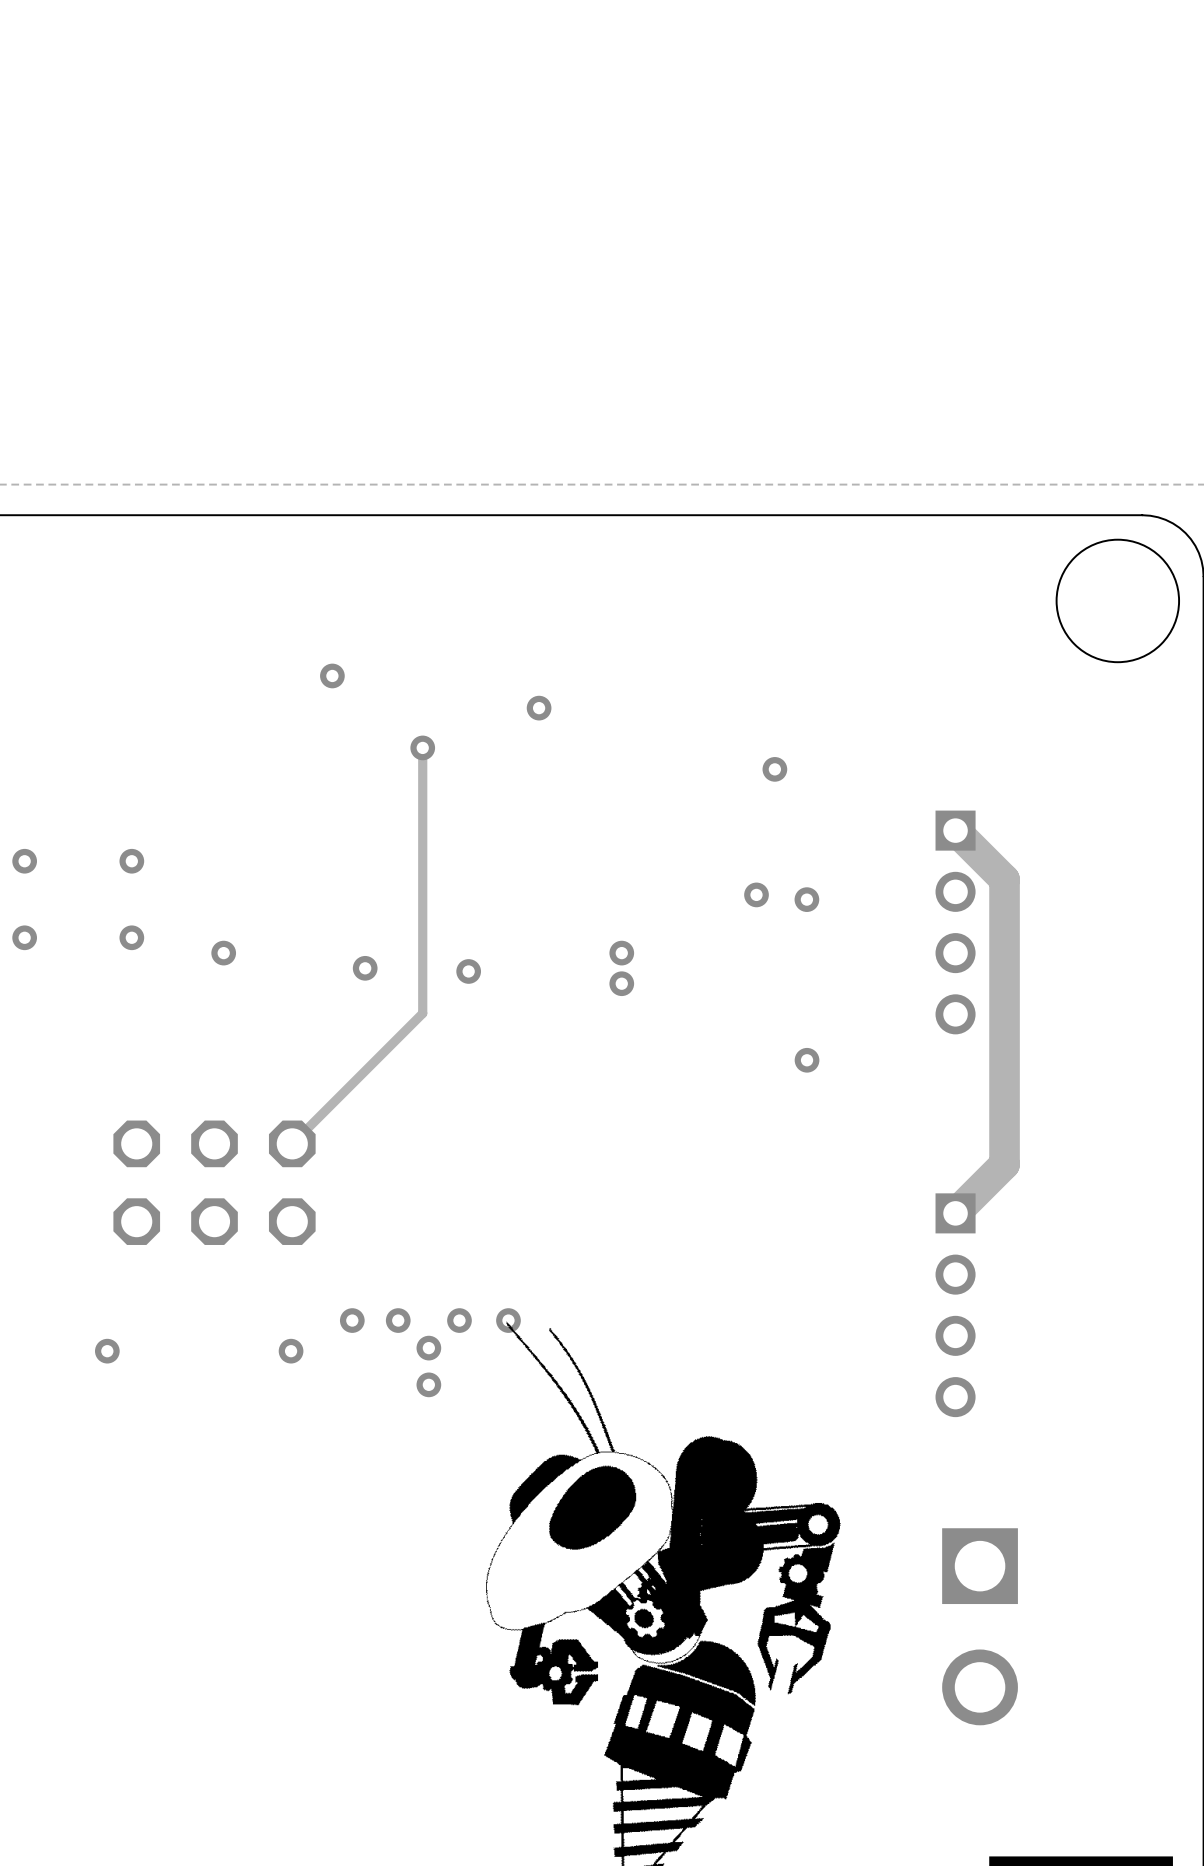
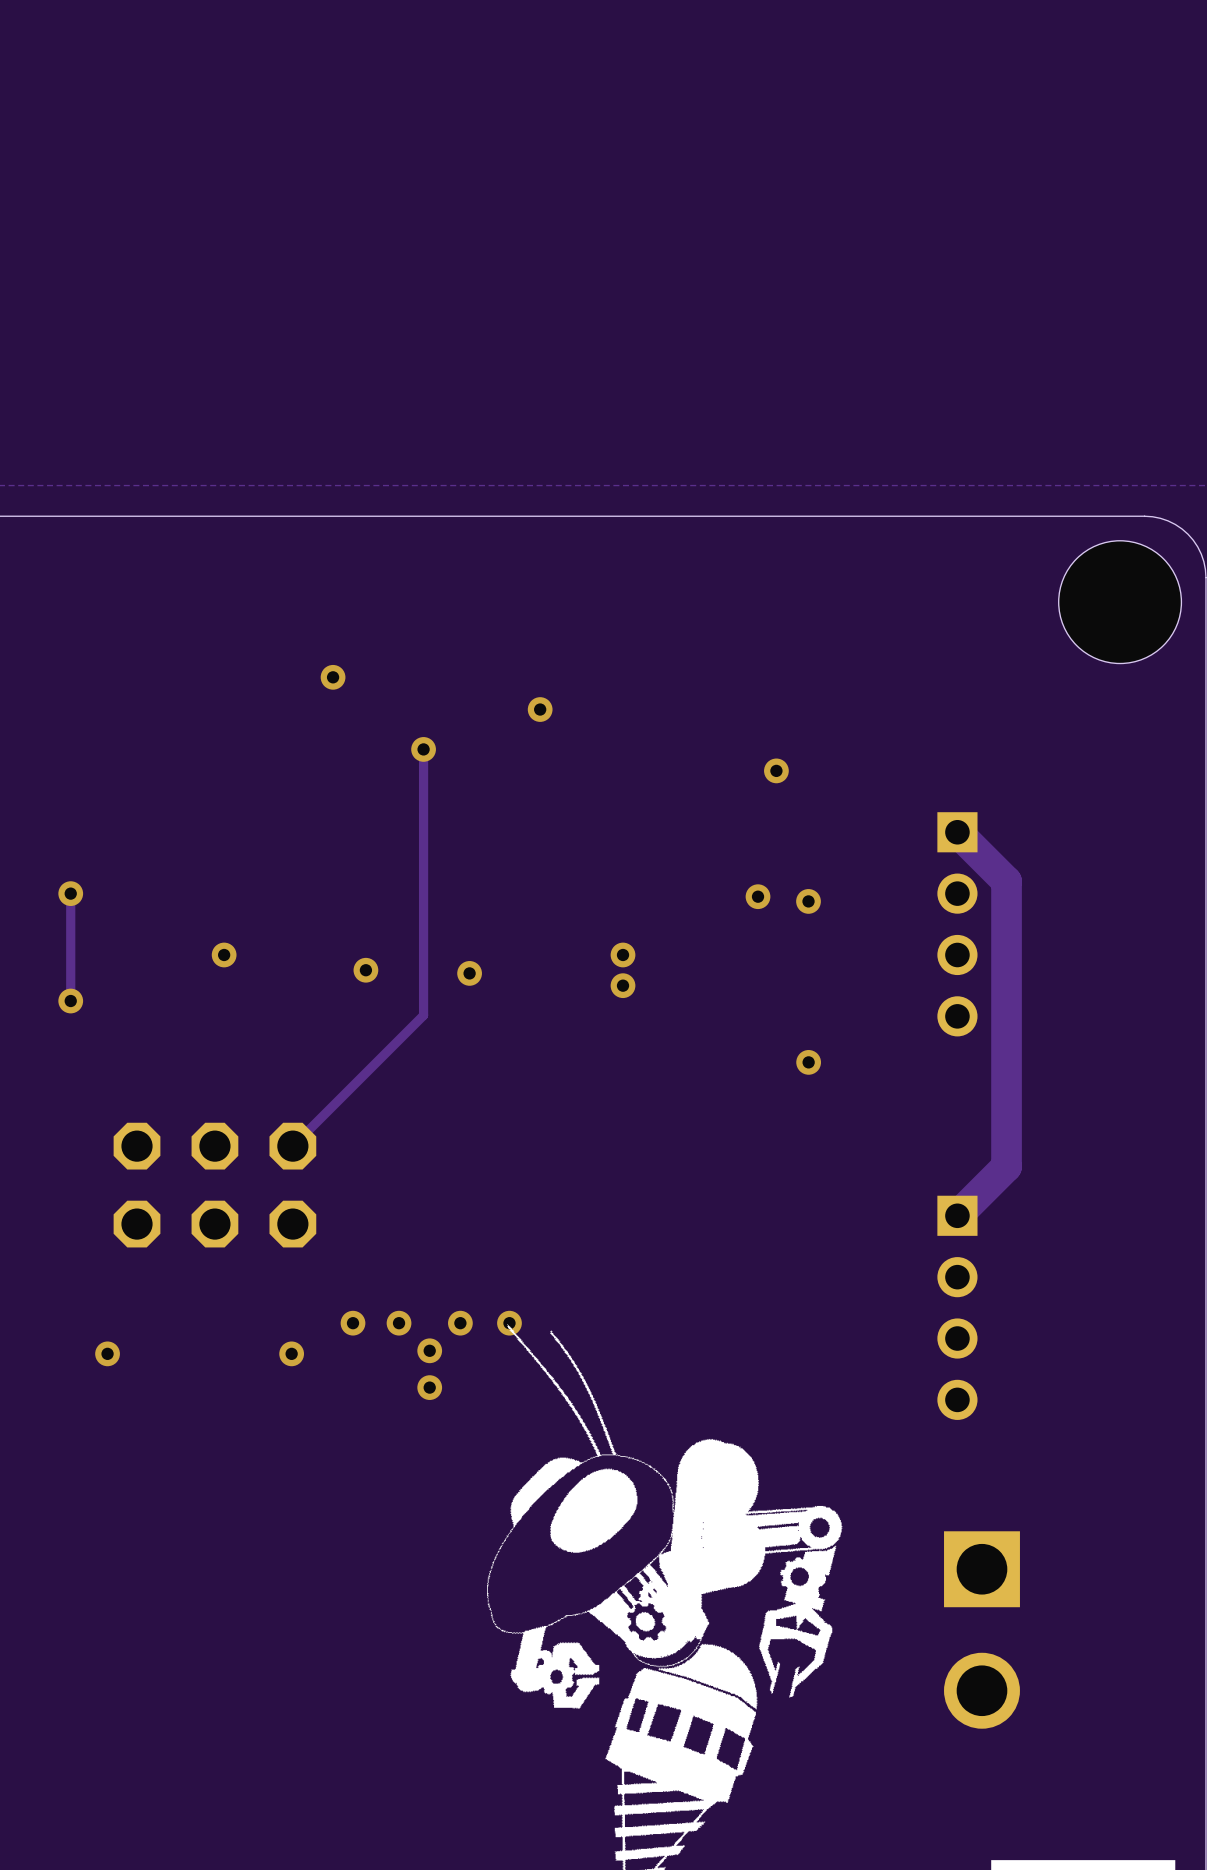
via: (24, 861) -> none
via: (131, 861) -> none
track: none -> (70, 893) (70, 1001)
via: none -> (70, 893)
via: (24, 937) -> none
via: (131, 937) -> none
via: none -> (70, 1001)

